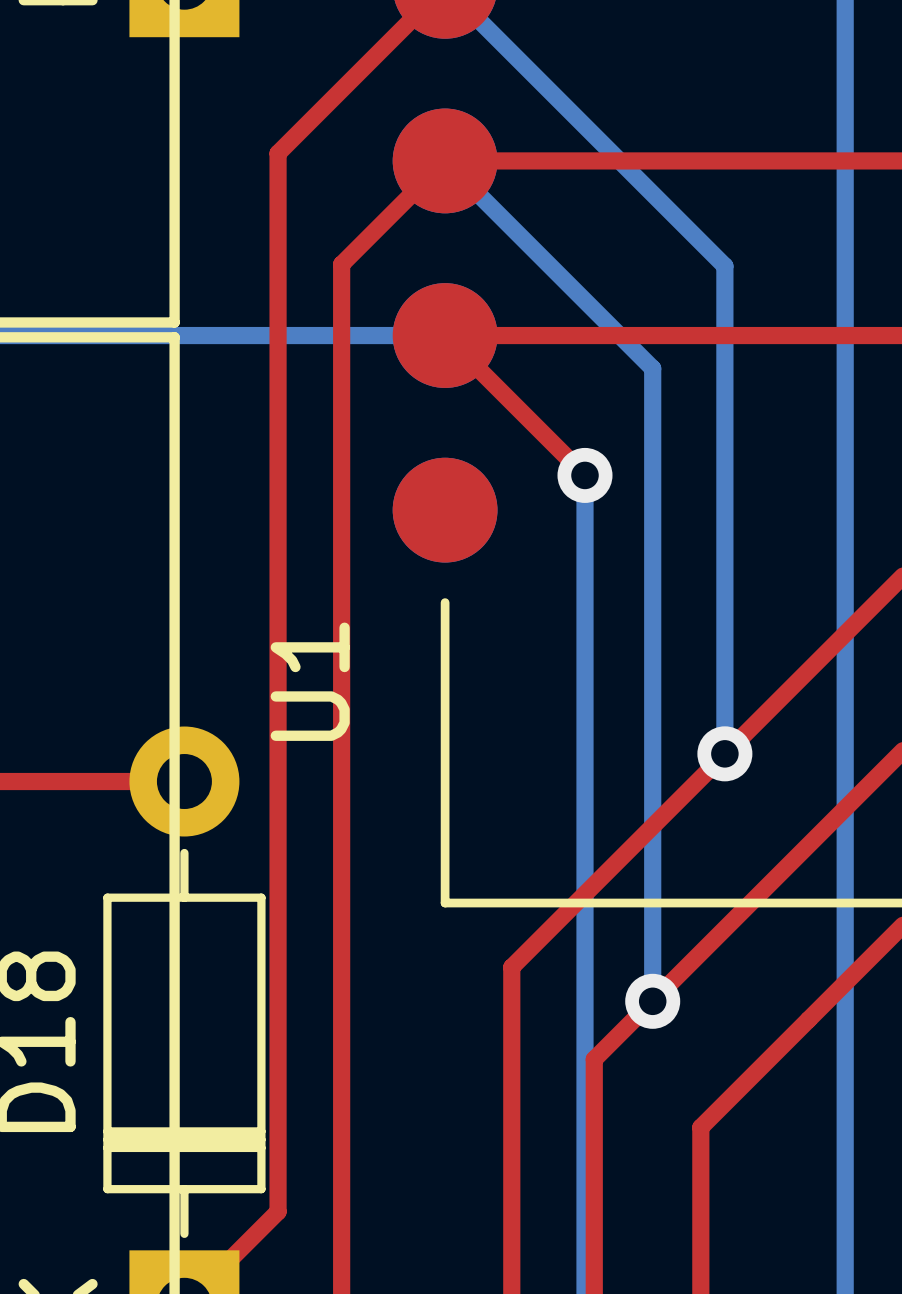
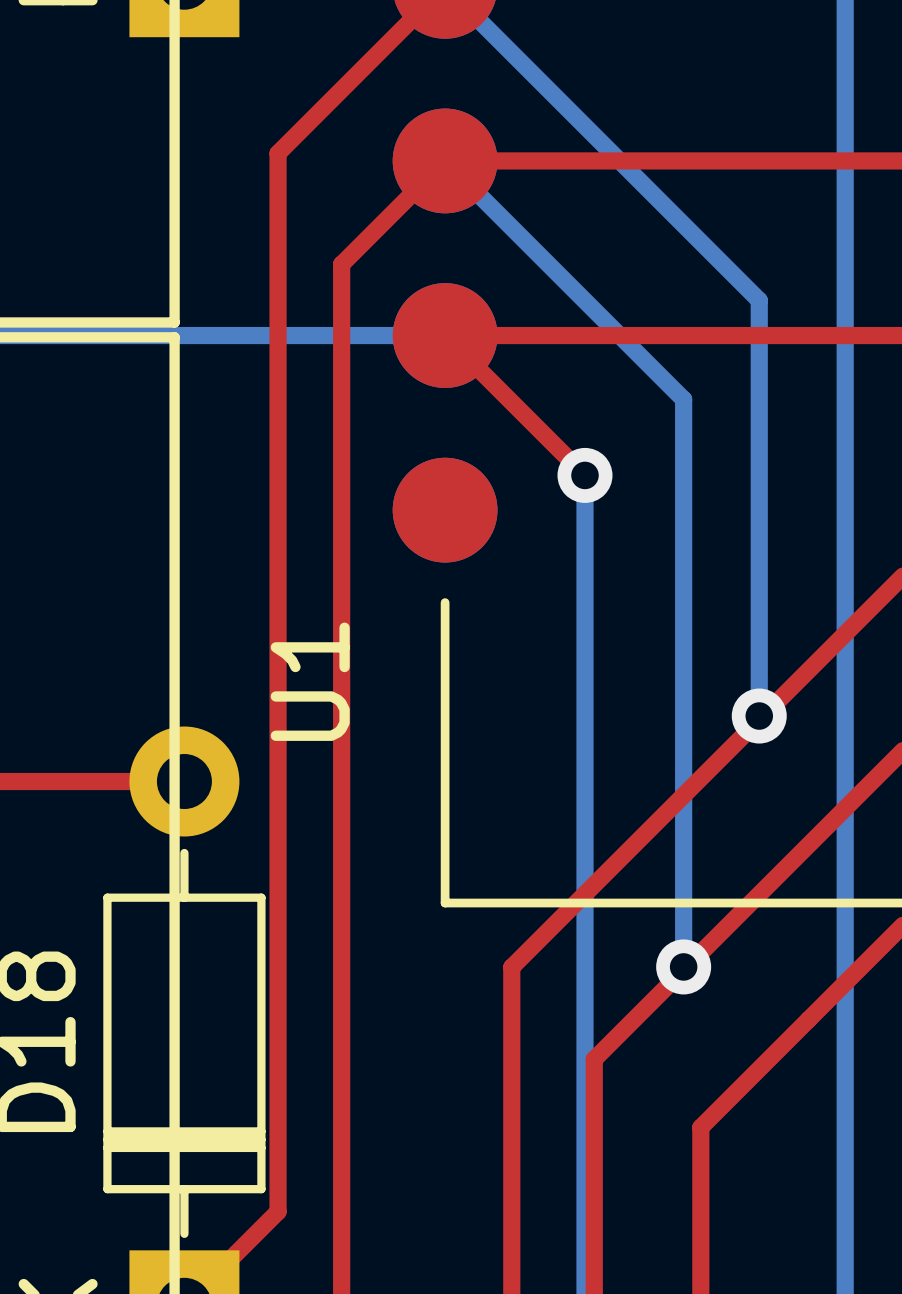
bottom track: (724, 266) (724, 753) -> (724, 266) (759, 300) (759, 716)
bottom track: (652, 368) (652, 1001) -> (652, 368) (683, 399) (683, 966)
via position: (724, 753) -> (759, 716)
via position: (652, 1001) -> (683, 966)

